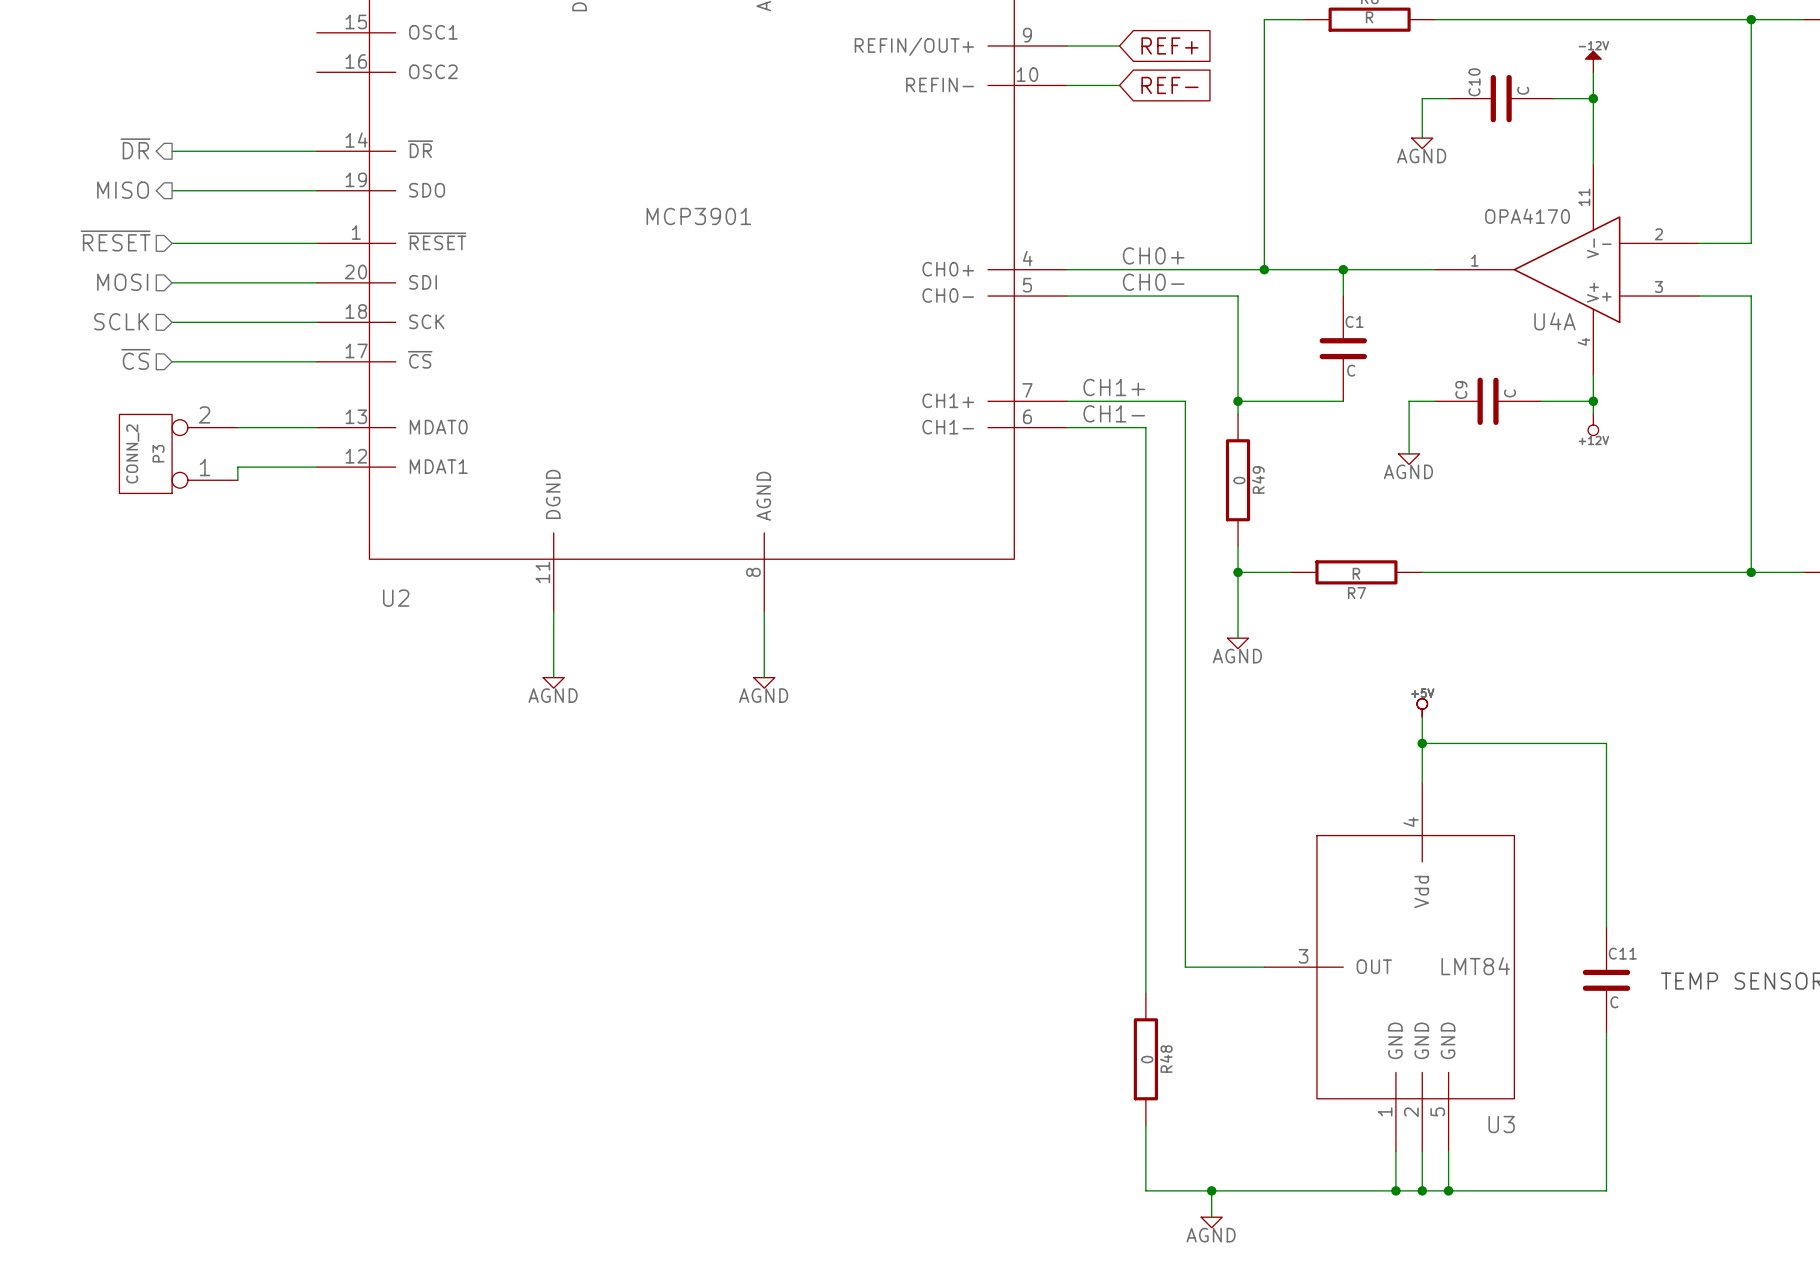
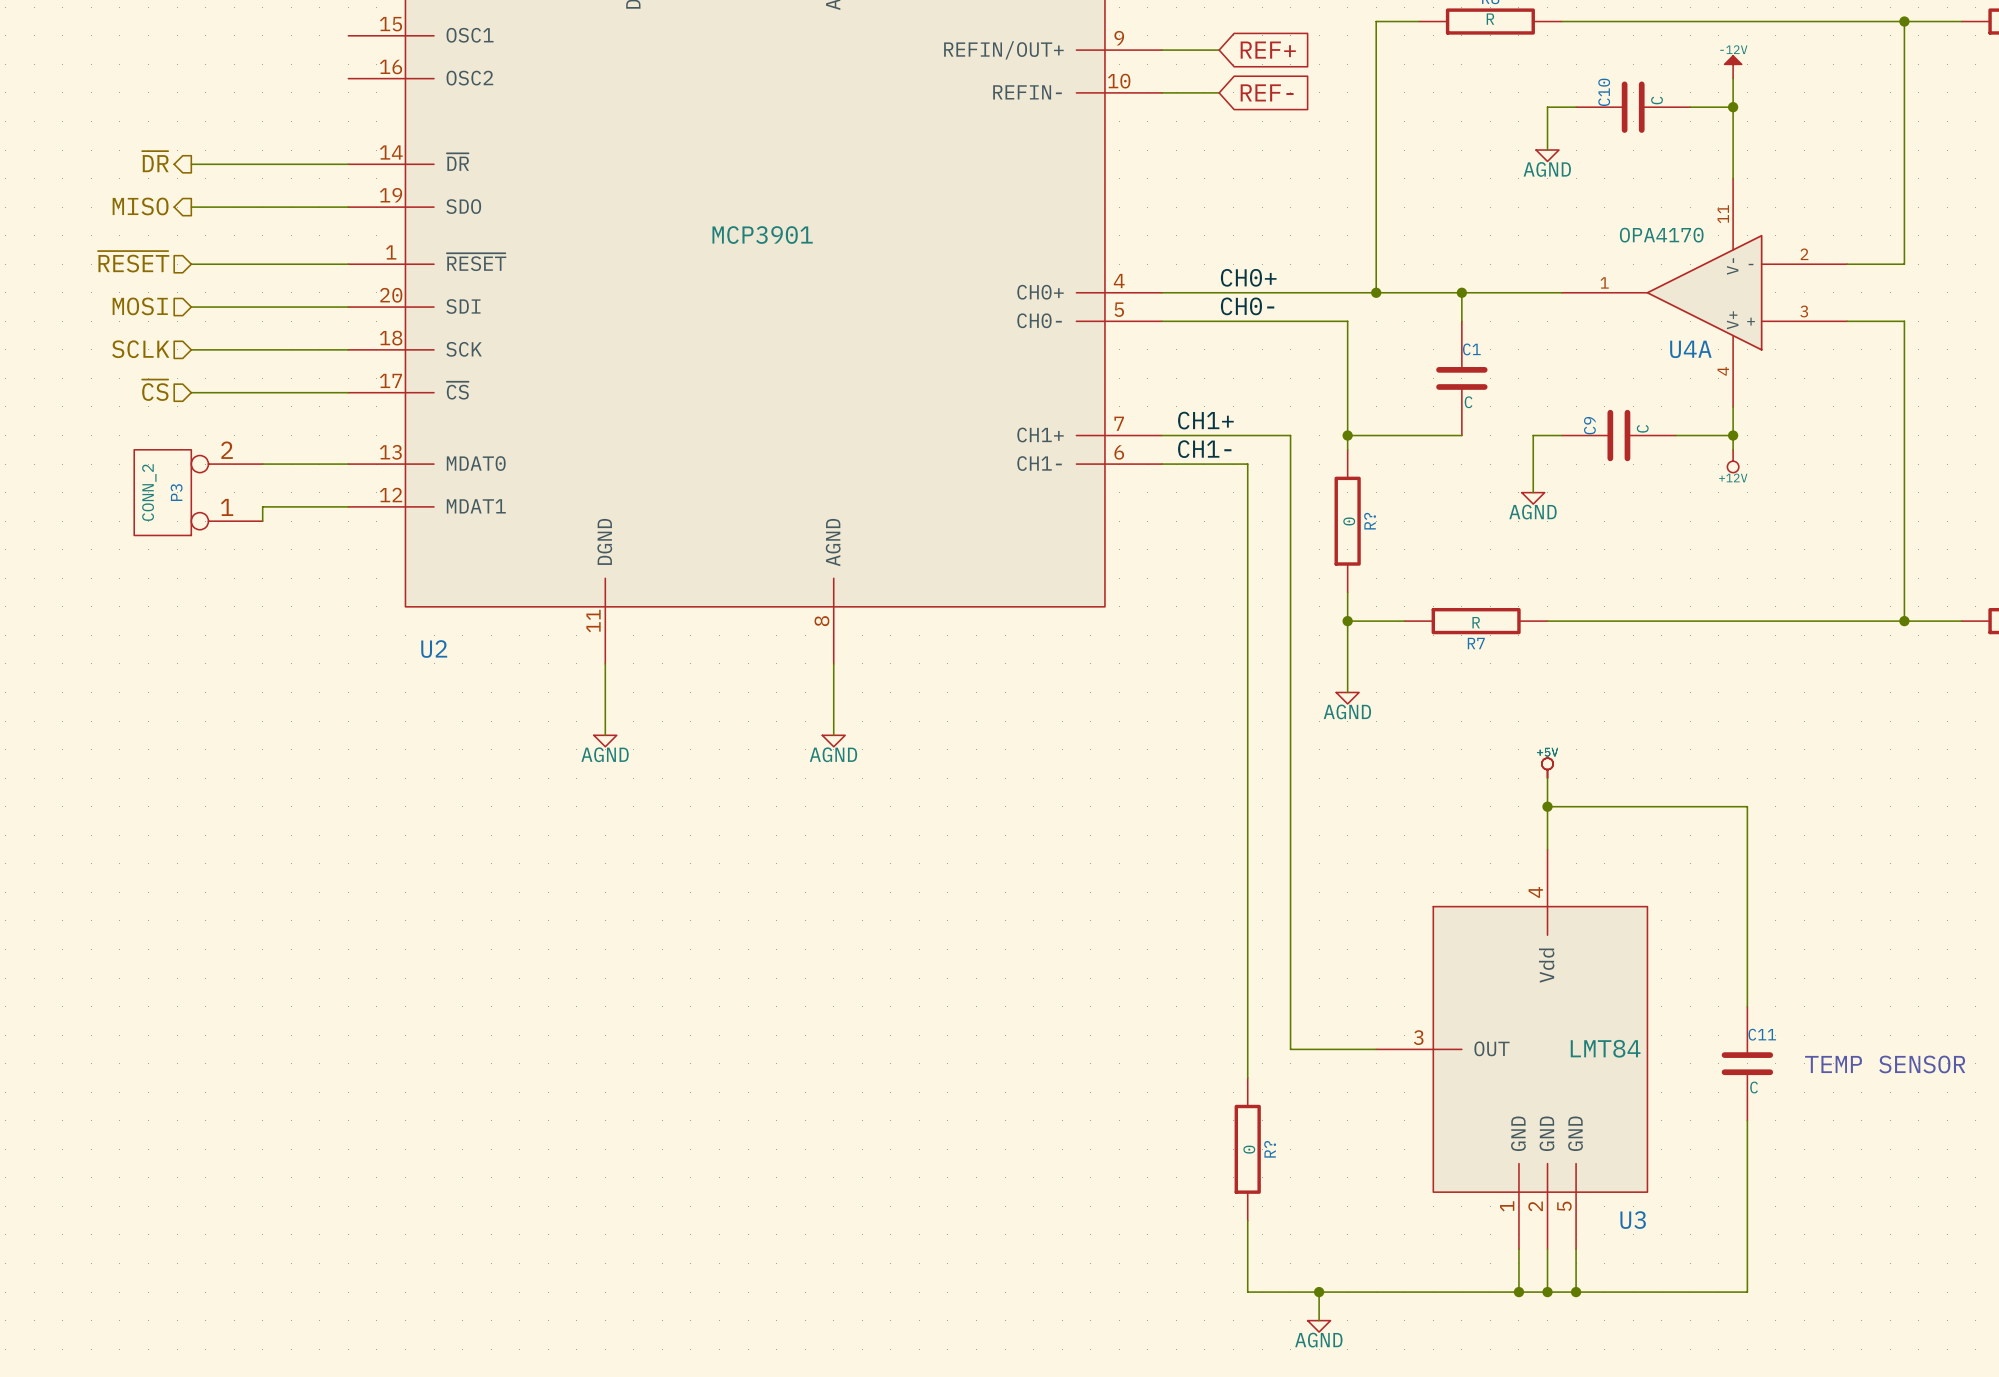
R49 name: R49 (1258, 480) -> R? (1370, 521)
R48 name: R48 (1166, 1059) -> R? (1270, 1149)

